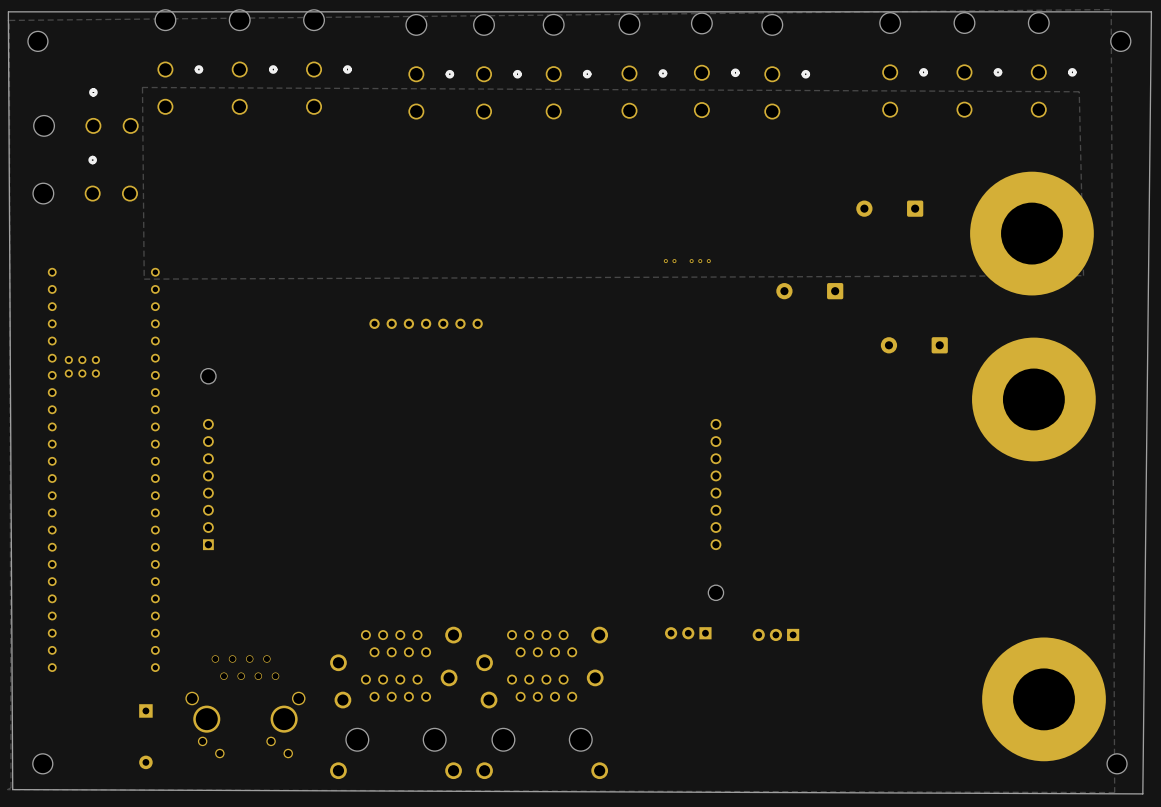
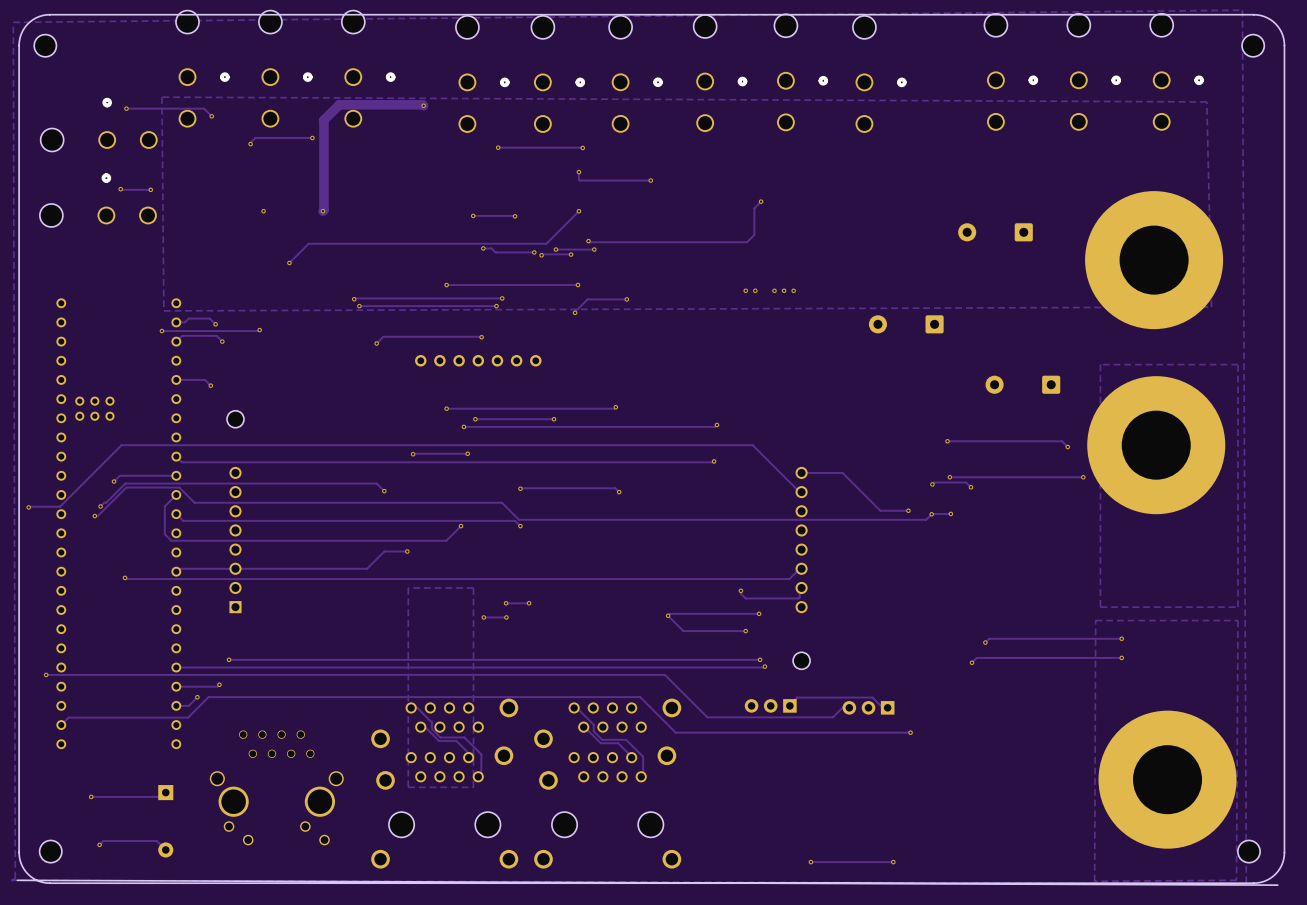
board edge: none -> (1253, 14) (49, 14) (33, 19) (23, 29) (19, 45) (19, 852) (23, 868) (33, 878) (49, 883) (1253, 883) (1270, 878) (1279, 868) (1284, 852) (1284, 45) (1281, 32) (1275, 23) (1263, 16) (1253, 14)
track: none -> (423, 105) (339, 104) (323, 120) (322, 211)
via: none -> (423, 105)
track: none -> (126, 108) (204, 108) (211, 116)
via: none -> (126, 108)
via: none -> (211, 116)
track: none -> (312, 137) (255, 137) (250, 144)
via: none -> (312, 137)
via: none -> (250, 144)
track: none -> (498, 147) (582, 147)
via: none -> (498, 147)
via: none -> (582, 147)
track: none -> (578, 172) (579, 180) (650, 180)
via: none -> (578, 172)
via: none -> (650, 180)
track: none -> (120, 189) (150, 189)
via: none -> (120, 189)
via: none -> (150, 189)
track: none -> (761, 201) (754, 208) (754, 234) (747, 242) (588, 241)
via: none -> (761, 201)
via: none -> (263, 211)
via: none -> (322, 211)
track: none -> (578, 211) (546, 243) (308, 243) (289, 262)
via: none -> (578, 211)
track: none -> (473, 215) (515, 216)
via: none -> (473, 215)
via: none -> (515, 216)
via: none -> (588, 241)
track: none -> (483, 248) (491, 248) (495, 252) (534, 252)
via: none -> (483, 248)
via: none -> (555, 249)
track: none -> (594, 249) (555, 249)
via: none -> (594, 249)
via: none -> (534, 252)
track: none -> (571, 254) (541, 255)
via: none -> (571, 254)
via: none -> (541, 255)
via: none -> (289, 262)
via: none -> (446, 285)
track: none -> (577, 285) (446, 285)
via: none -> (577, 285)
track: none -> (502, 298) (354, 299)
via: none -> (502, 298)
via: none -> (354, 299)
track: none -> (626, 299) (587, 299) (575, 312)
via: none -> (626, 299)
via: none -> (359, 306)
track: none -> (496, 306) (359, 306)
via: none -> (496, 306)
via: none -> (575, 312)
track: none -> (176, 322) (184, 322) (188, 318) (209, 318) (215, 324)
via: none -> (215, 324)
track: none -> (259, 330) (161, 331)
via: none -> (259, 330)
via: none -> (161, 331)
track: none -> (481, 337) (383, 336) (376, 343)
via: none -> (481, 337)
track: none -> (222, 341) (216, 335) (182, 335) (176, 341)
via: none -> (222, 341)
via: none -> (376, 343)
zone outline: none -> (1237, 364) (1100, 364) (1100, 607) (1237, 607) (1237, 364)
track: none -> (176, 379) (205, 379) (210, 385)
via: none -> (210, 385)
track: none -> (616, 406) (614, 408) (446, 408)
via: none -> (615, 407)
via: none -> (446, 408)
via: none -> (475, 419)
track: none -> (554, 419) (475, 419)
via: none -> (554, 419)
track: none -> (716, 424) (715, 426) (463, 426)
via: none -> (716, 424)
via: none -> (463, 426)
track: none -> (947, 441) (1062, 441) (1067, 447)
via: none -> (947, 441)
via: none -> (1067, 447)
via: none -> (413, 454)
track: none -> (467, 453) (413, 454)
via: none -> (467, 453)
track: none -> (176, 456) (181, 462) (714, 461)
via: none -> (714, 461)
track: none -> (799, 472) (842, 472) (880, 510) (908, 510)
track: none -> (176, 475) (119, 475) (114, 481)
via: none -> (949, 477)
track: none -> (1083, 477) (949, 477)
via: none -> (1083, 477)
via: none -> (114, 481)
track: none -> (932, 484) (934, 482) (966, 482) (971, 487)
via: none -> (932, 484)
via: none -> (971, 487)
track: none -> (520, 488) (615, 488) (619, 492)
via: none -> (520, 488)
track: none -> (384, 491) (376, 483) (125, 483) (100, 506)
via: none -> (384, 491)
via: none -> (619, 492)
track: none -> (799, 492) (752, 445) (121, 445) (60, 506) (28, 507)
track: none -> (176, 494) (164, 506) (164, 534) (171, 540) (446, 540) (461, 526)
via: none -> (100, 506)
via: none -> (28, 507)
via: none -> (908, 510)
track: none -> (176, 514) (183, 520) (515, 520) (520, 526)
via: none -> (931, 514)
track: none -> (950, 513) (932, 513) (926, 519) (519, 519) (501, 502) (194, 502) (179, 487) (126, 487) (97, 516) (94, 516)
via: none -> (950, 513)
via: none -> (94, 516)
via: none -> (461, 526)
via: none -> (520, 526)
track: none -> (407, 551) (384, 551) (367, 568) (179, 568) (176, 571)
via: none -> (407, 551)
track: none -> (799, 568) (789, 579) (125, 577)
via: none -> (125, 577)
zone outline: none -> (473, 587) (408, 587) (408, 787) (473, 787) (473, 587)
track: none -> (799, 587) (798, 598) (745, 598) (740, 593) (740, 590)
via: none -> (740, 590)
via: none -> (506, 603)
track: none -> (529, 603) (506, 603)
via: none -> (529, 603)
track: none -> (759, 613) (670, 613) (668, 615) (683, 631) (745, 631)
via: none -> (759, 613)
via: none -> (668, 615)
track: none -> (483, 616) (506, 617)
via: none -> (483, 617)
via: none -> (506, 617)
zone outline: none -> (1237, 620) (1095, 620) (1094, 881) (1236, 880) (1237, 620)
via: none -> (745, 631)
track: none -> (1121, 638) (989, 638) (985, 642)
via: none -> (1121, 638)
via: none -> (985, 642)
track: none -> (1121, 657) (976, 657) (971, 662)
via: none -> (1121, 657)
via: none -> (229, 659)
track: none -> (760, 659) (229, 659)
via: none -> (760, 659)
via: none -> (971, 662)
track: none -> (764, 666) (176, 667)
via: none -> (764, 666)
track: none -> (45, 675) (664, 674) (707, 717) (832, 717) (843, 706)
via: none -> (46, 674)
track: none -> (219, 684) (217, 686) (176, 686)
via: none -> (219, 684)
track: none -> (197, 697) (188, 705) (176, 705)
via: none -> (197, 697)
track: none -> (414, 706) (431, 722) (431, 728) (440, 737) (464, 737) (481, 754) (481, 775)
track: none -> (787, 706) (797, 697) (872, 697) (881, 707)
track: none -> (576, 708) (593, 724) (593, 731) (602, 739) (626, 739) (643, 756) (643, 777)
track: none -> (61, 725) (68, 717) (188, 717) (208, 697) (640, 697) (675, 732) (910, 732)
track: none -> (423, 725) (438, 740) (456, 740) (471, 756)
track: none -> (585, 728) (600, 743) (618, 743) (633, 758)
via: none -> (910, 732)
track: none -> (165, 792) (161, 796) (91, 796)
via: none -> (91, 796)
track: none -> (99, 844) (103, 841) (156, 841) (165, 849)
via: none -> (99, 844)
via: none -> (810, 862)
track: none -> (893, 862) (810, 862)
via: none -> (893, 862)
board edge: (12, 789) (8, 11) (1151, 11) (1142, 793) -> none

